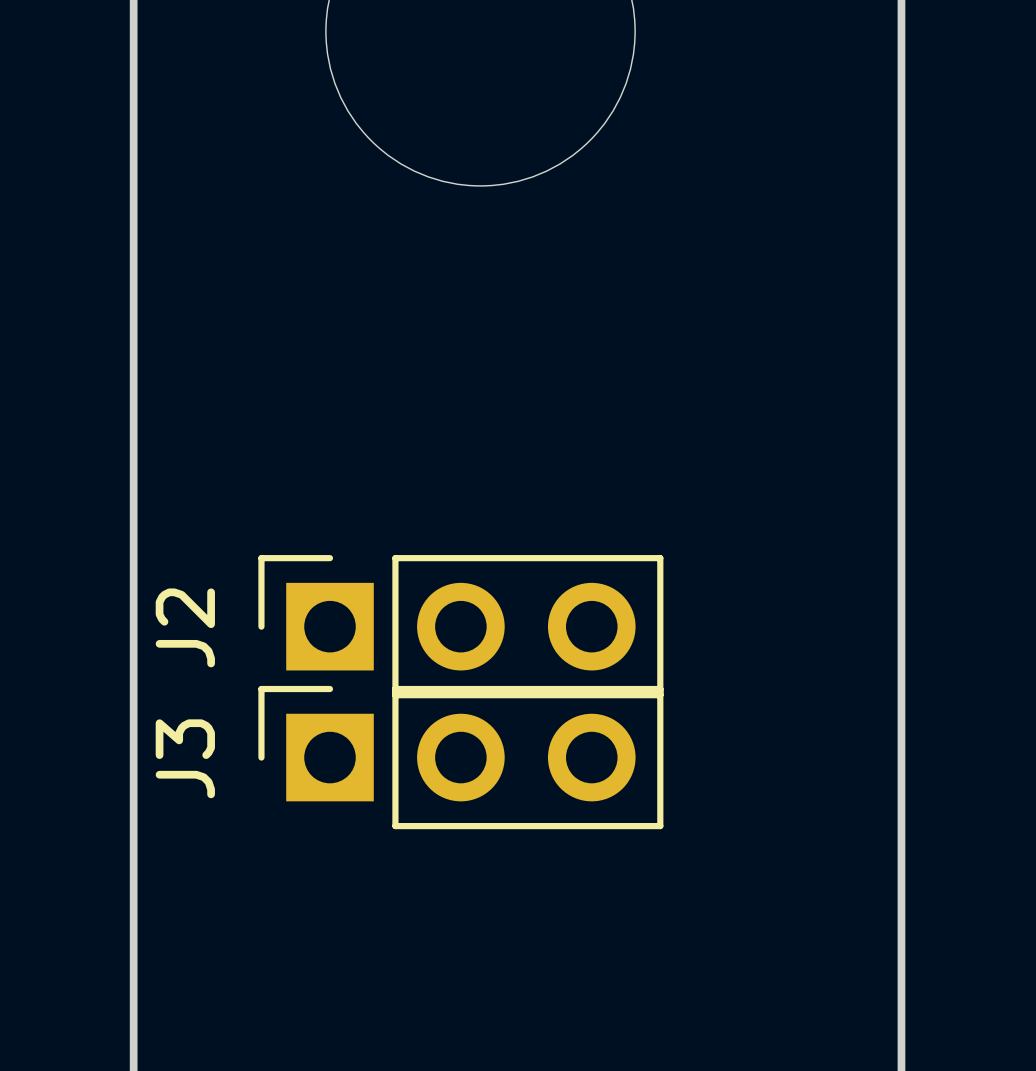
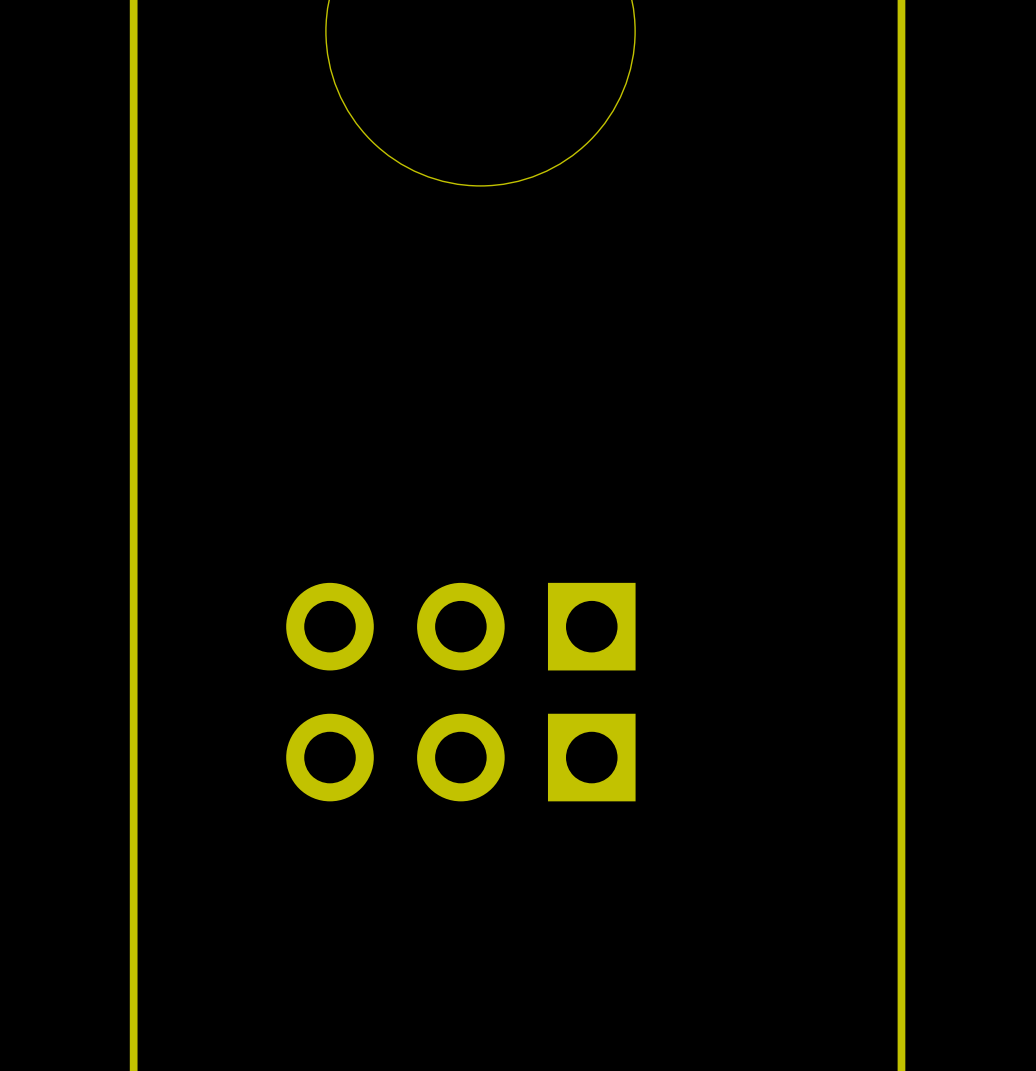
J2 side: top (460, 626) -> bottom (460, 626)
J3 side: top (460, 757) -> bottom (460, 757)

